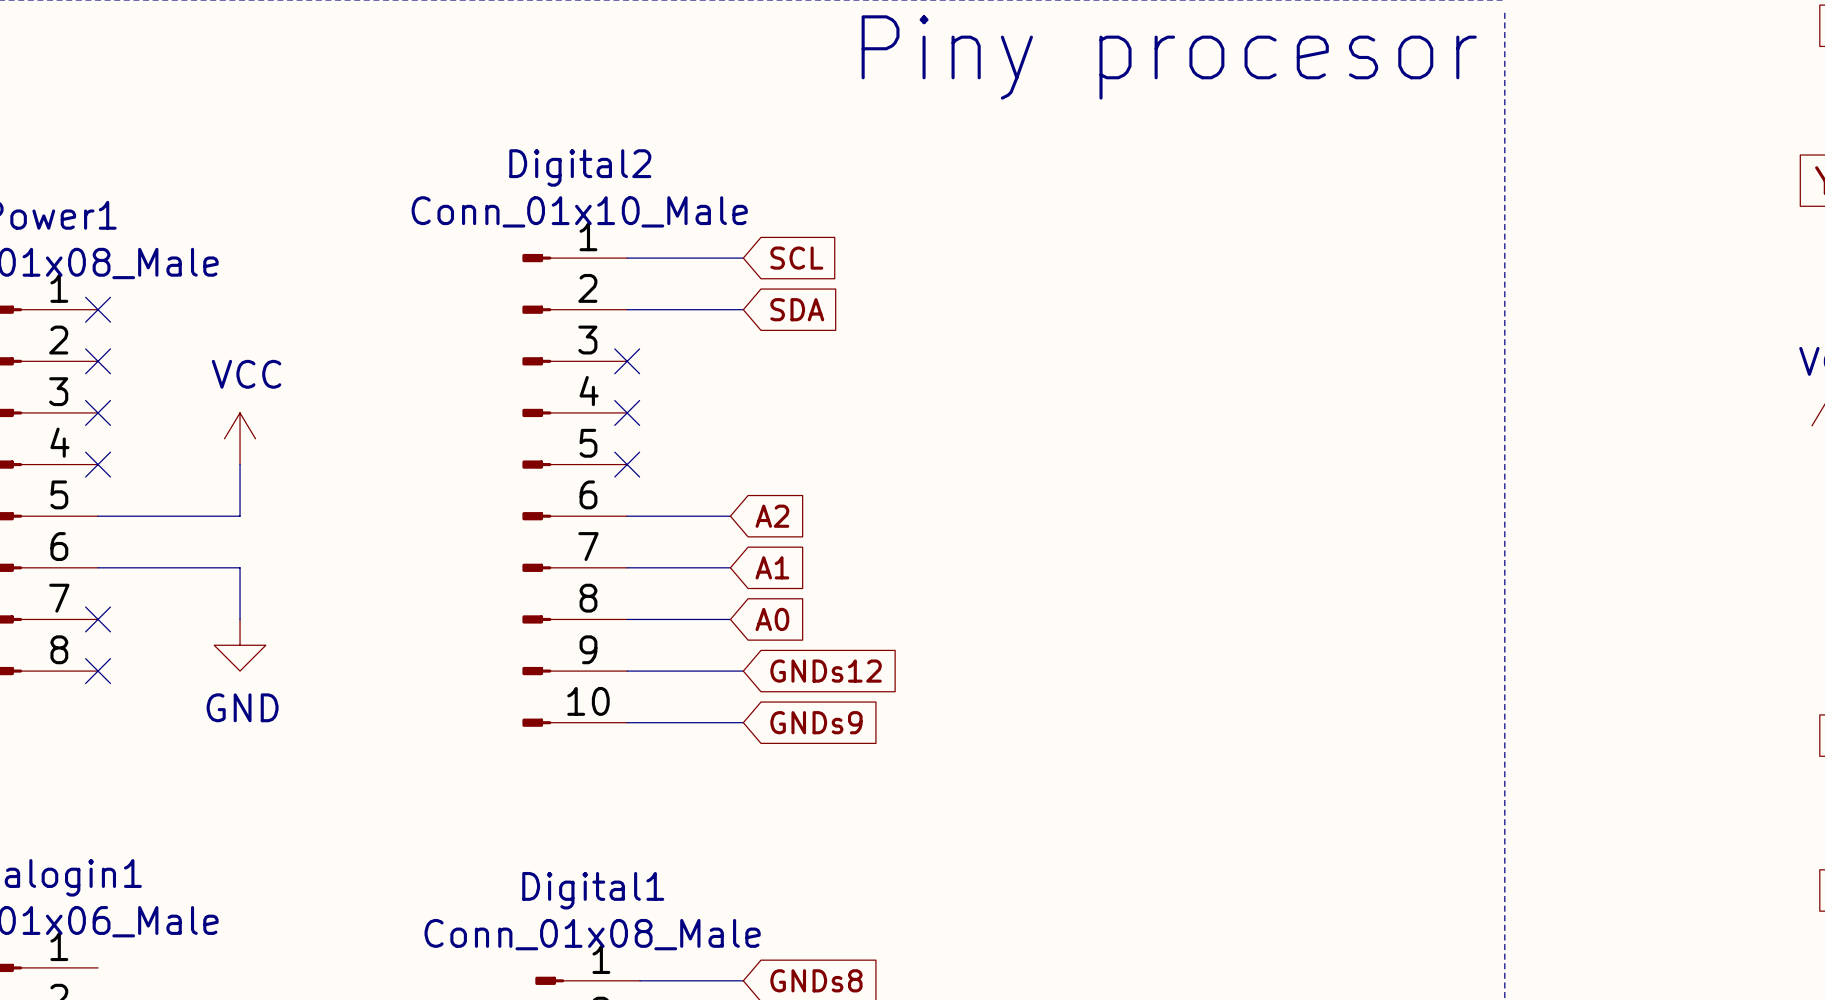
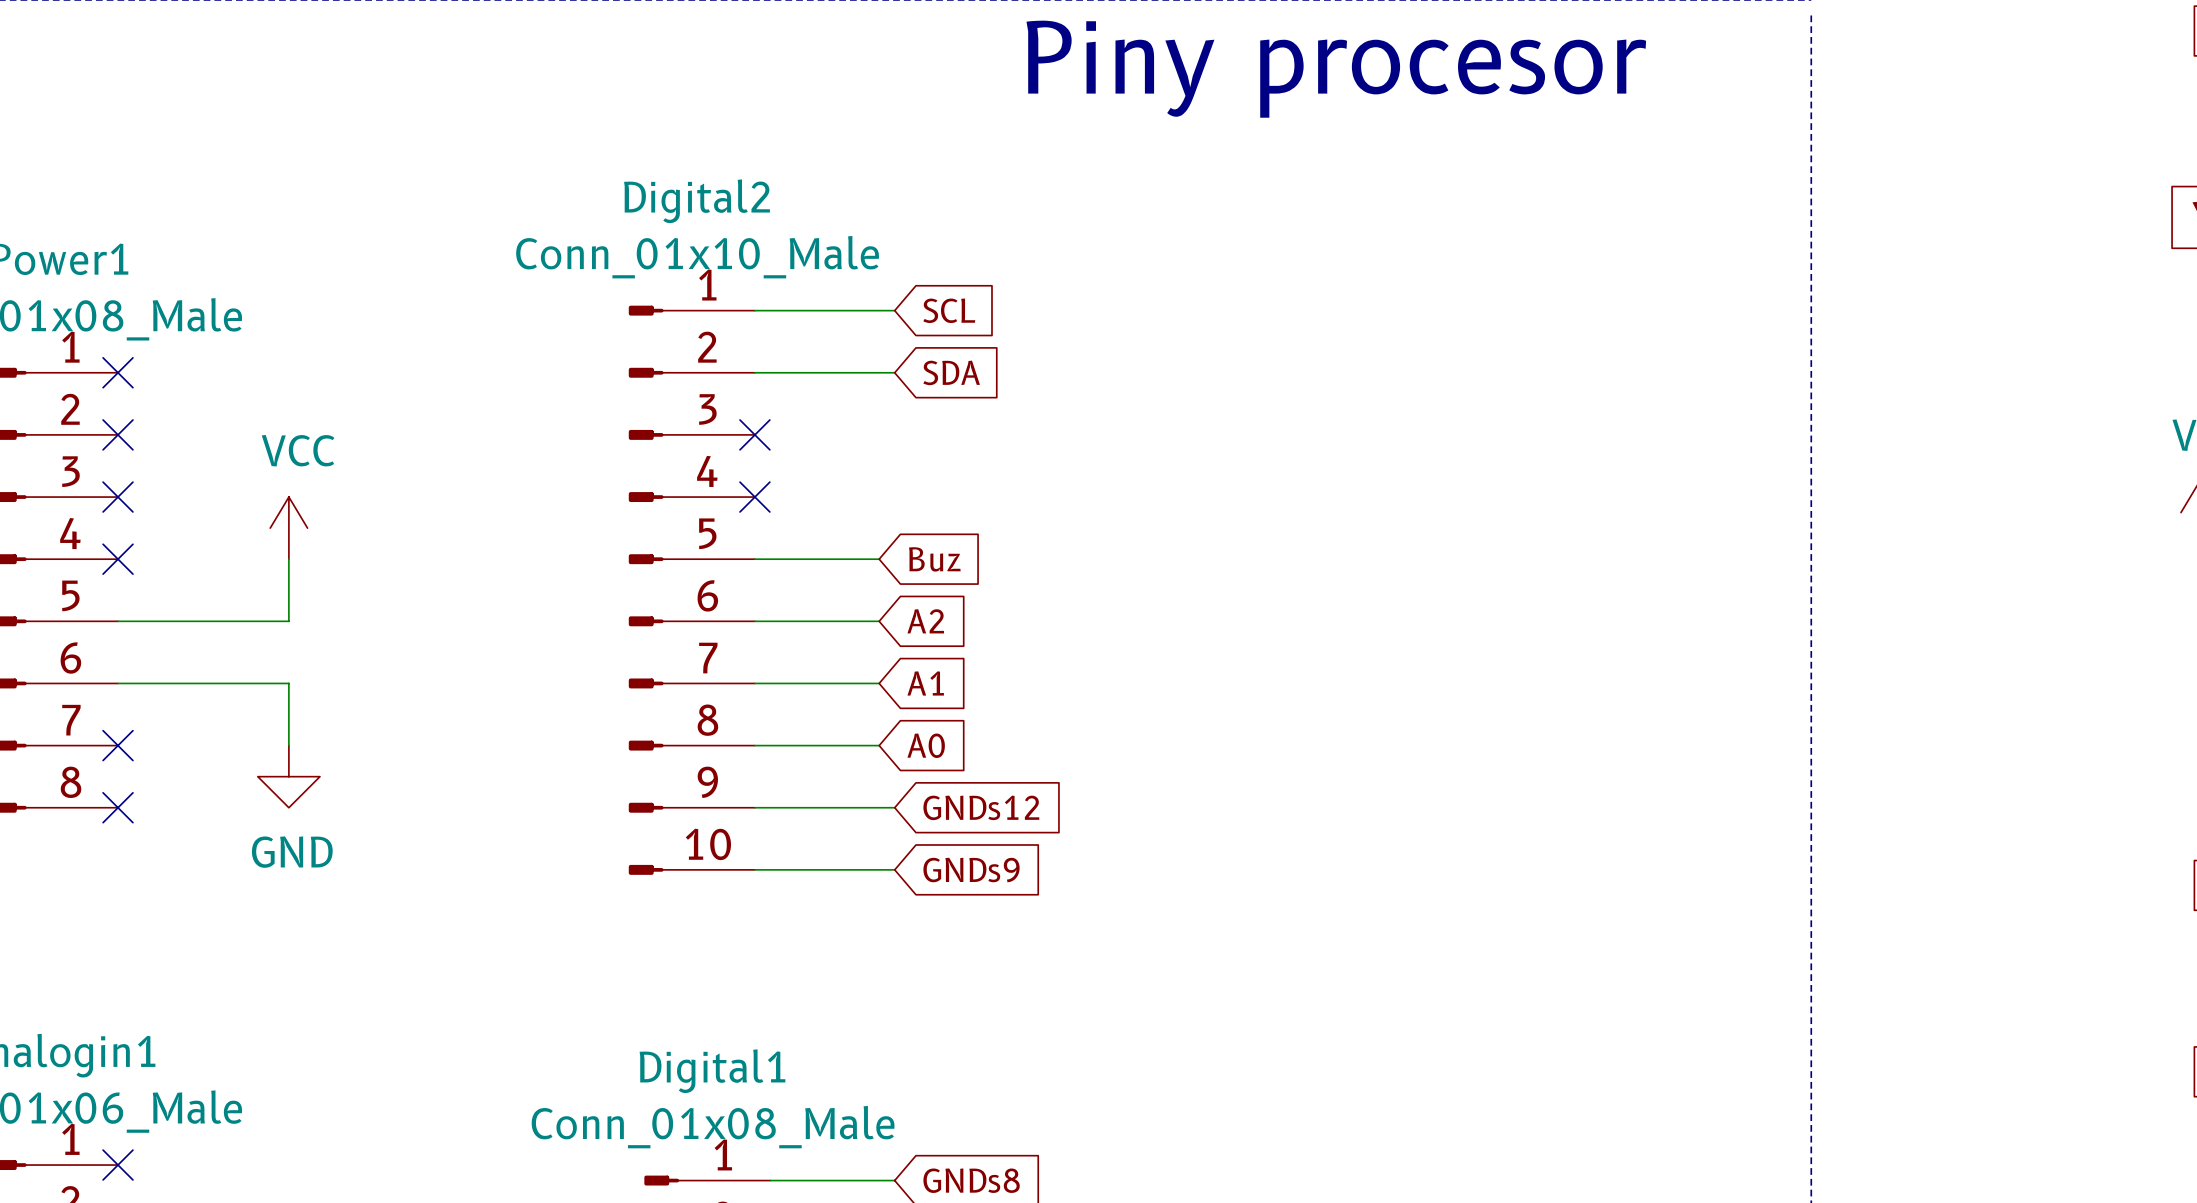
wire: none -> (754, 559) (879, 559)
no-connect mark: (627, 464) -> none
global label: none -> Buz (934, 559)
no-connect mark: none -> (118, 1165)

